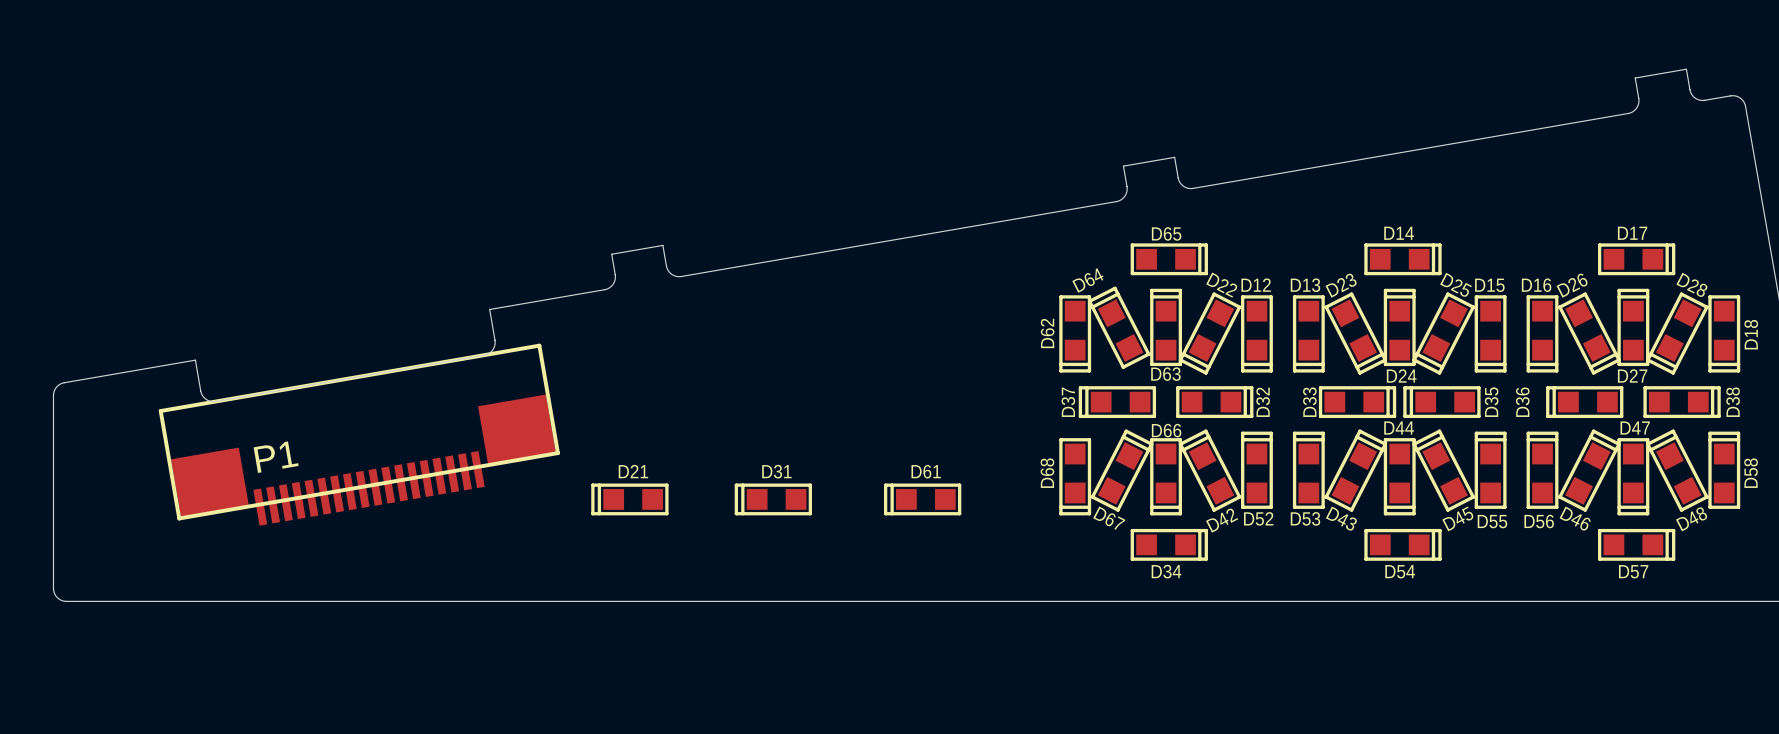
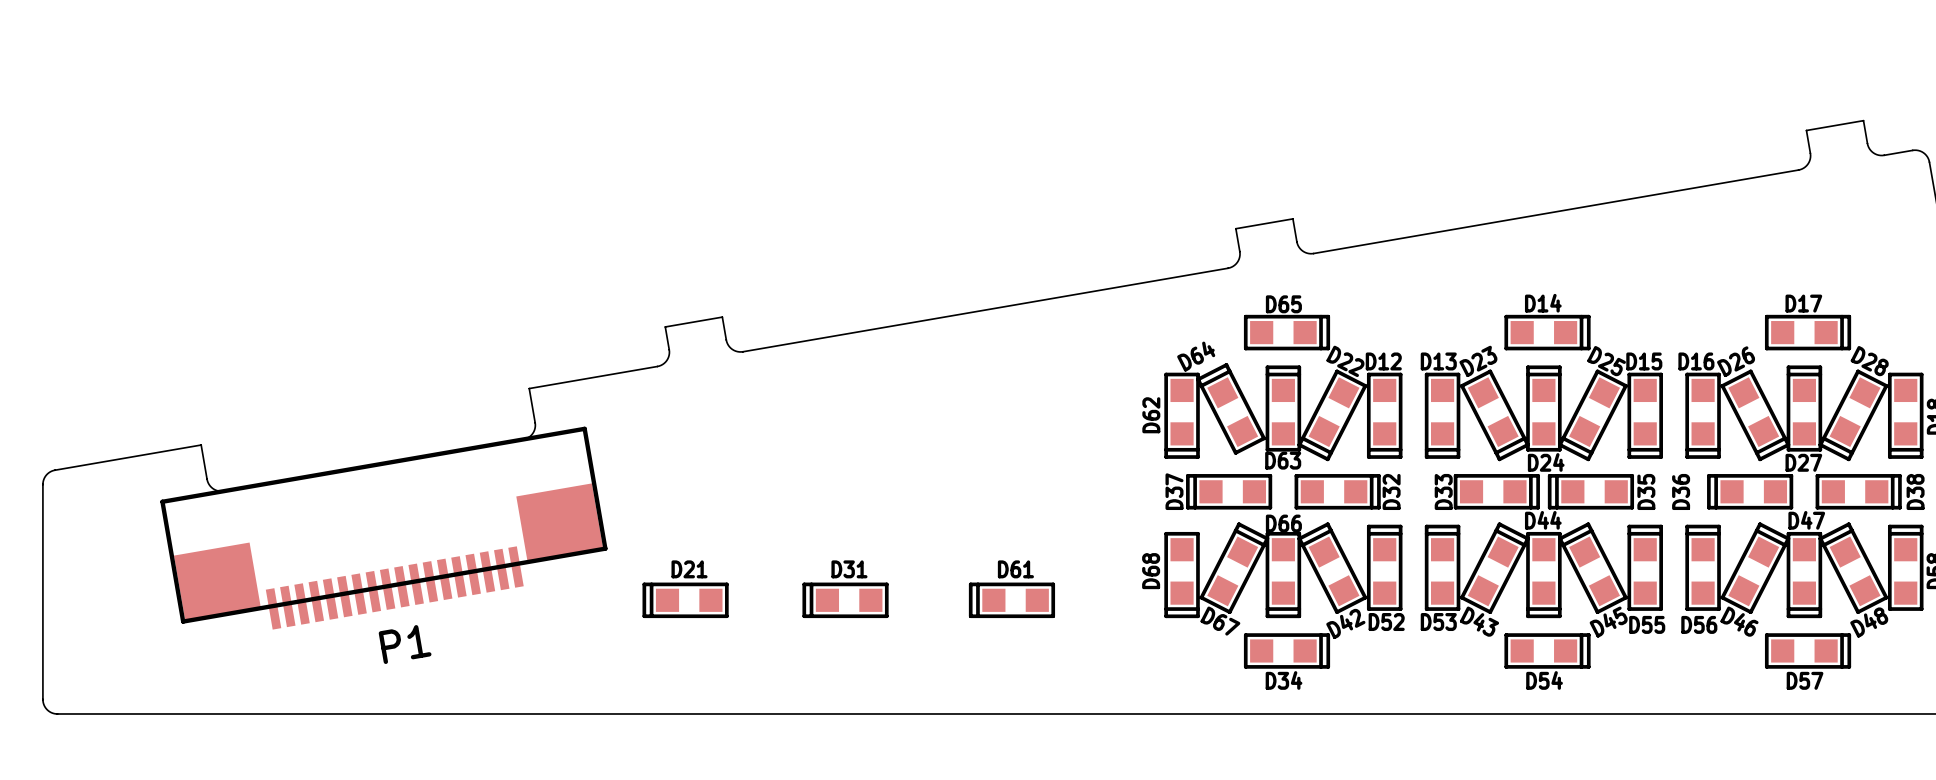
P1 name position: P1 (276, 457) -> P1 (405, 644)

